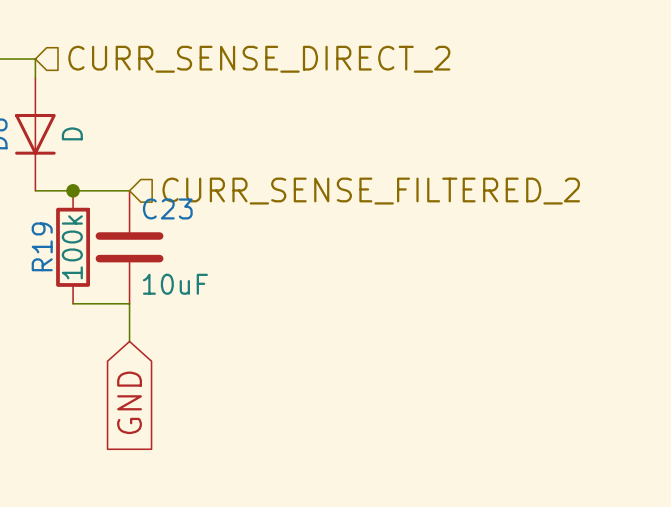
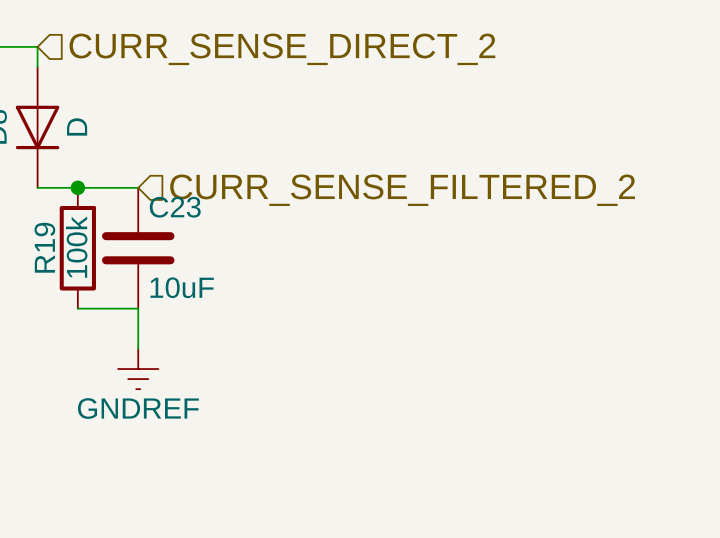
power symbol: none -> GNDREF (138, 369)
global label: GND (129, 402) -> none

